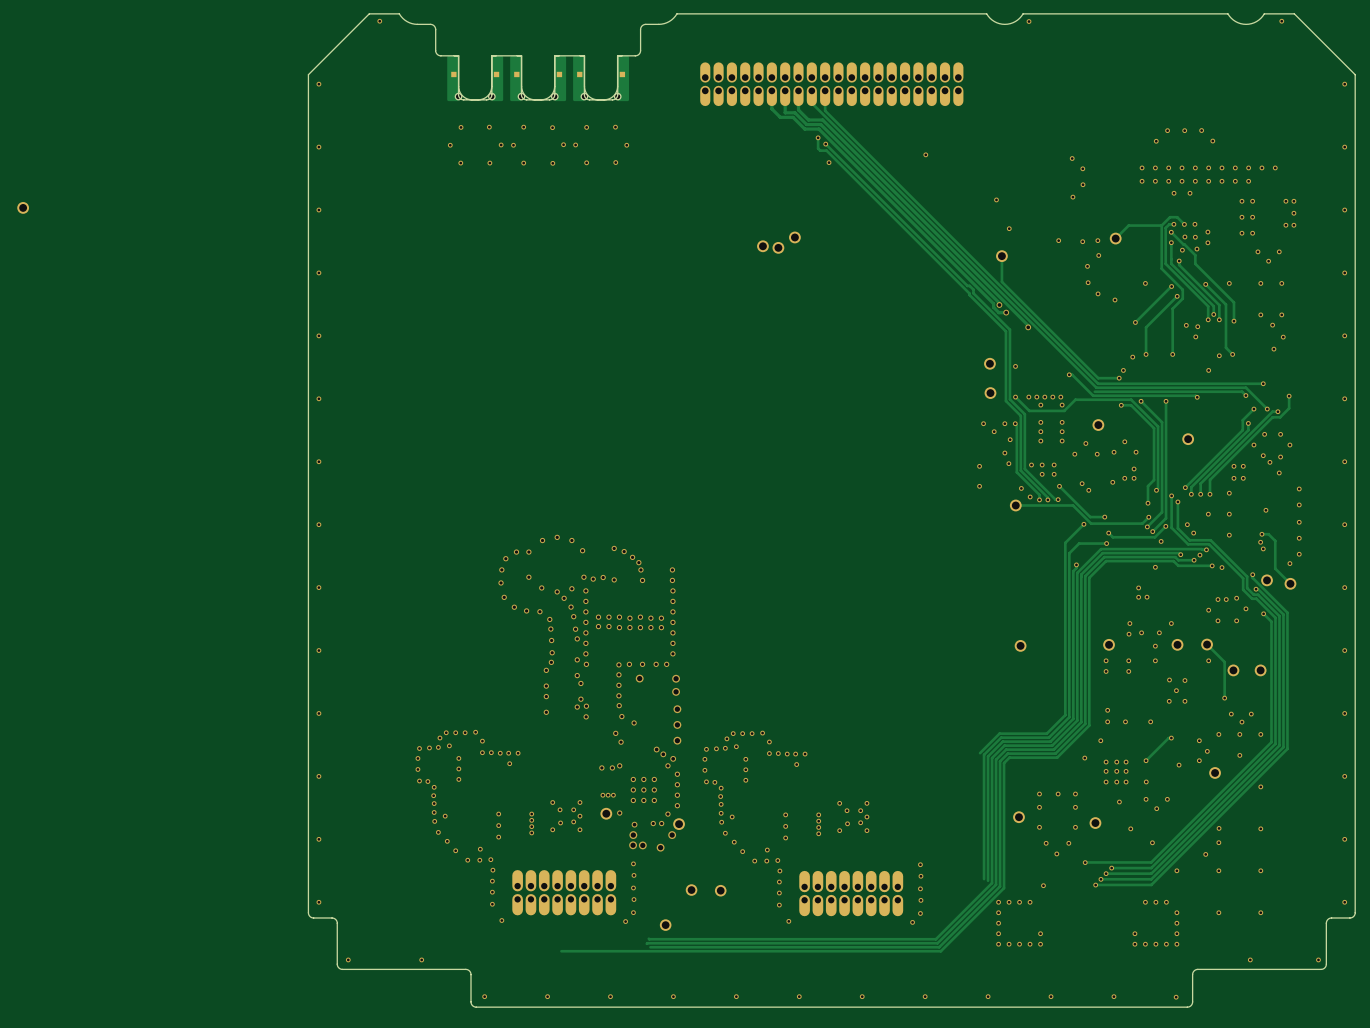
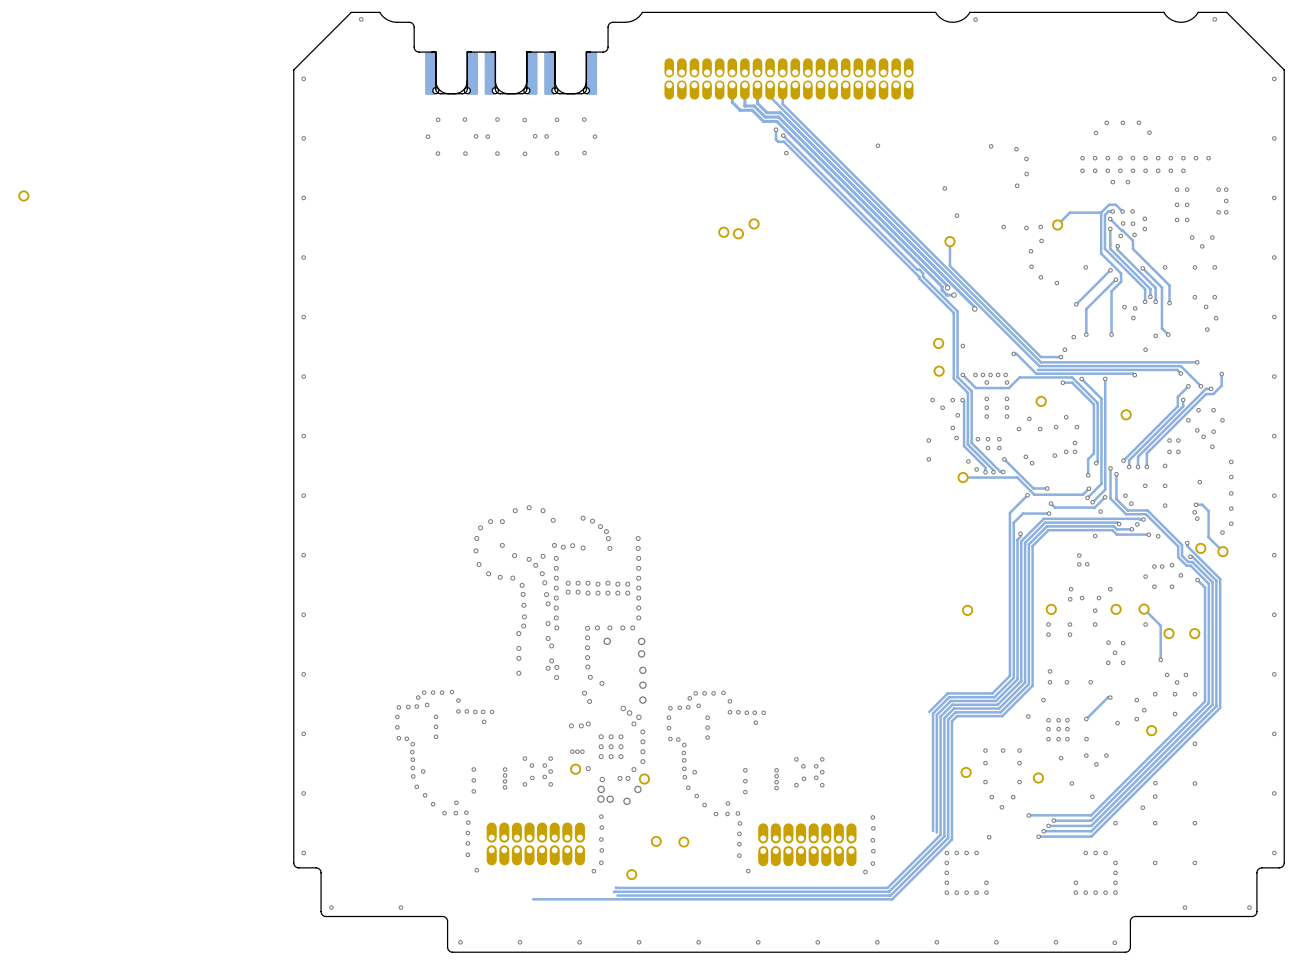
via: none -> (991, 146)

